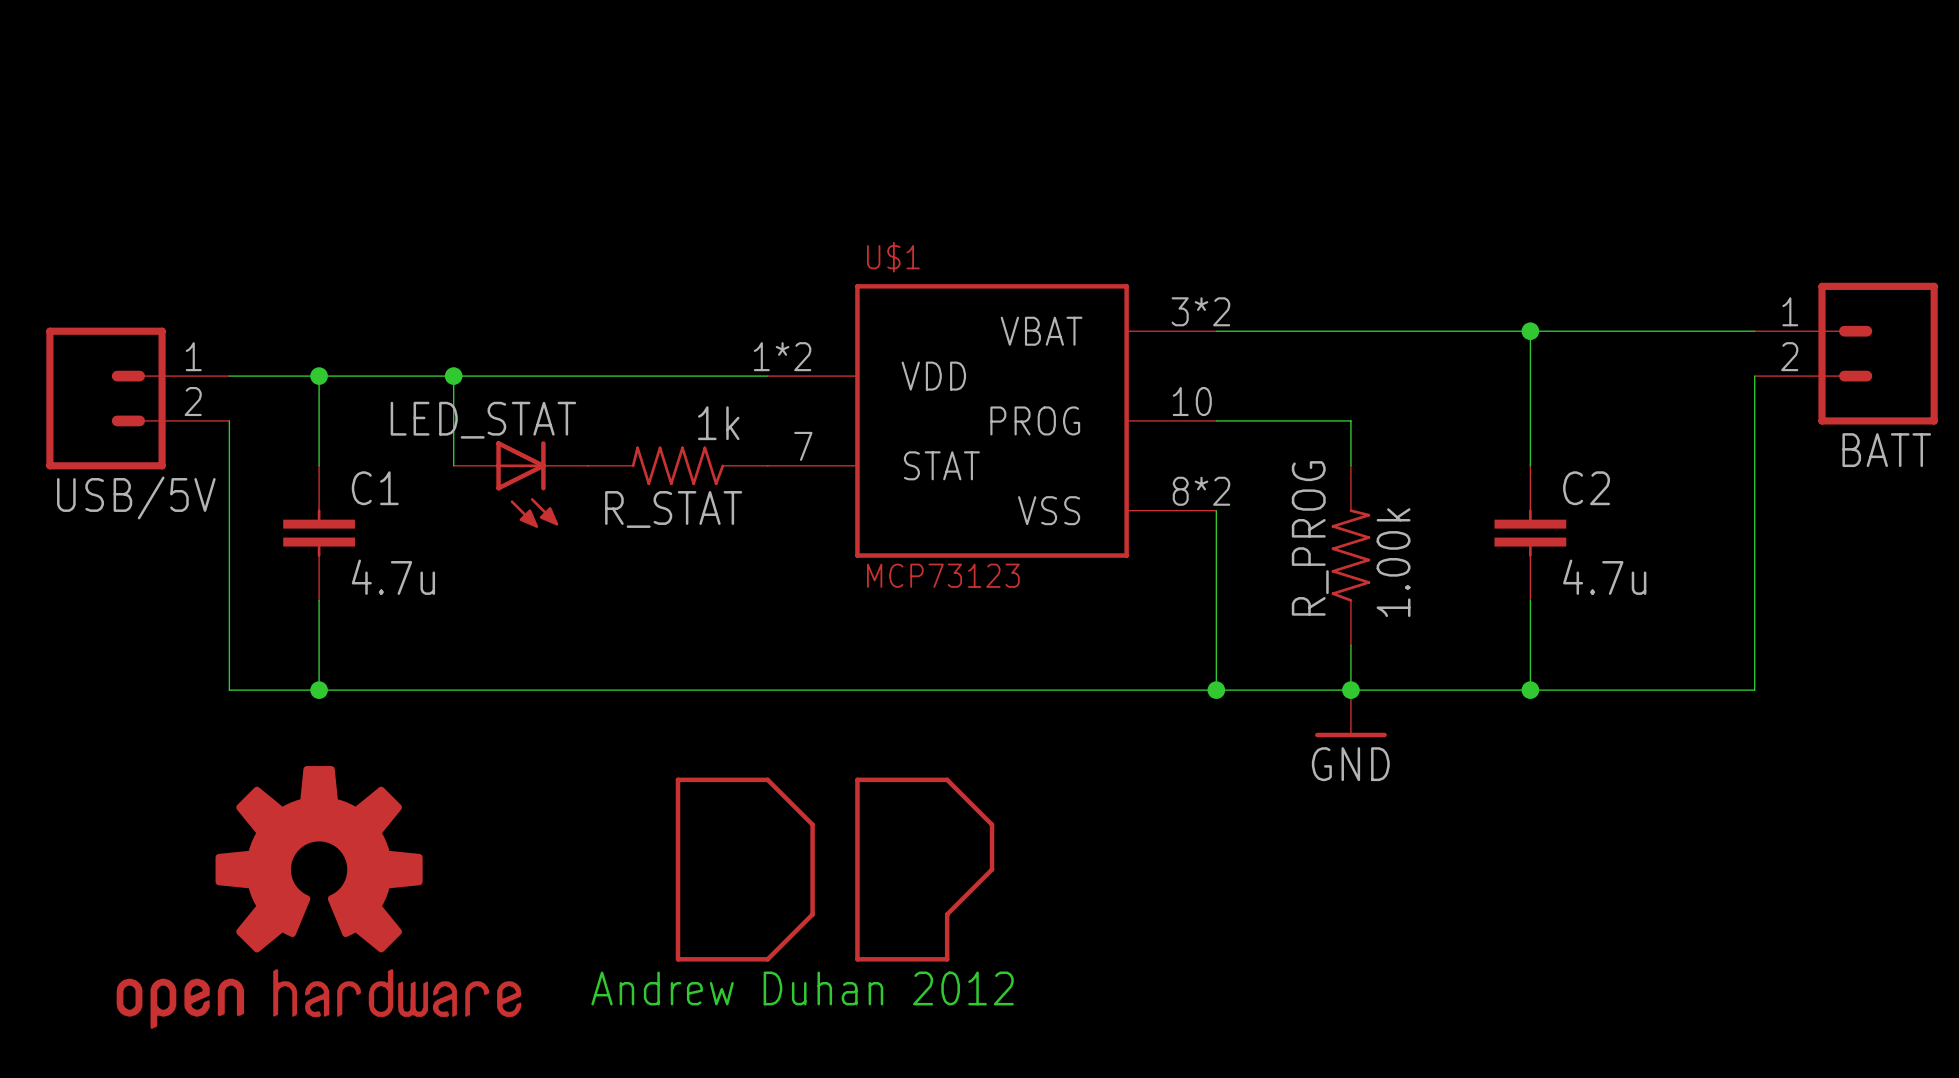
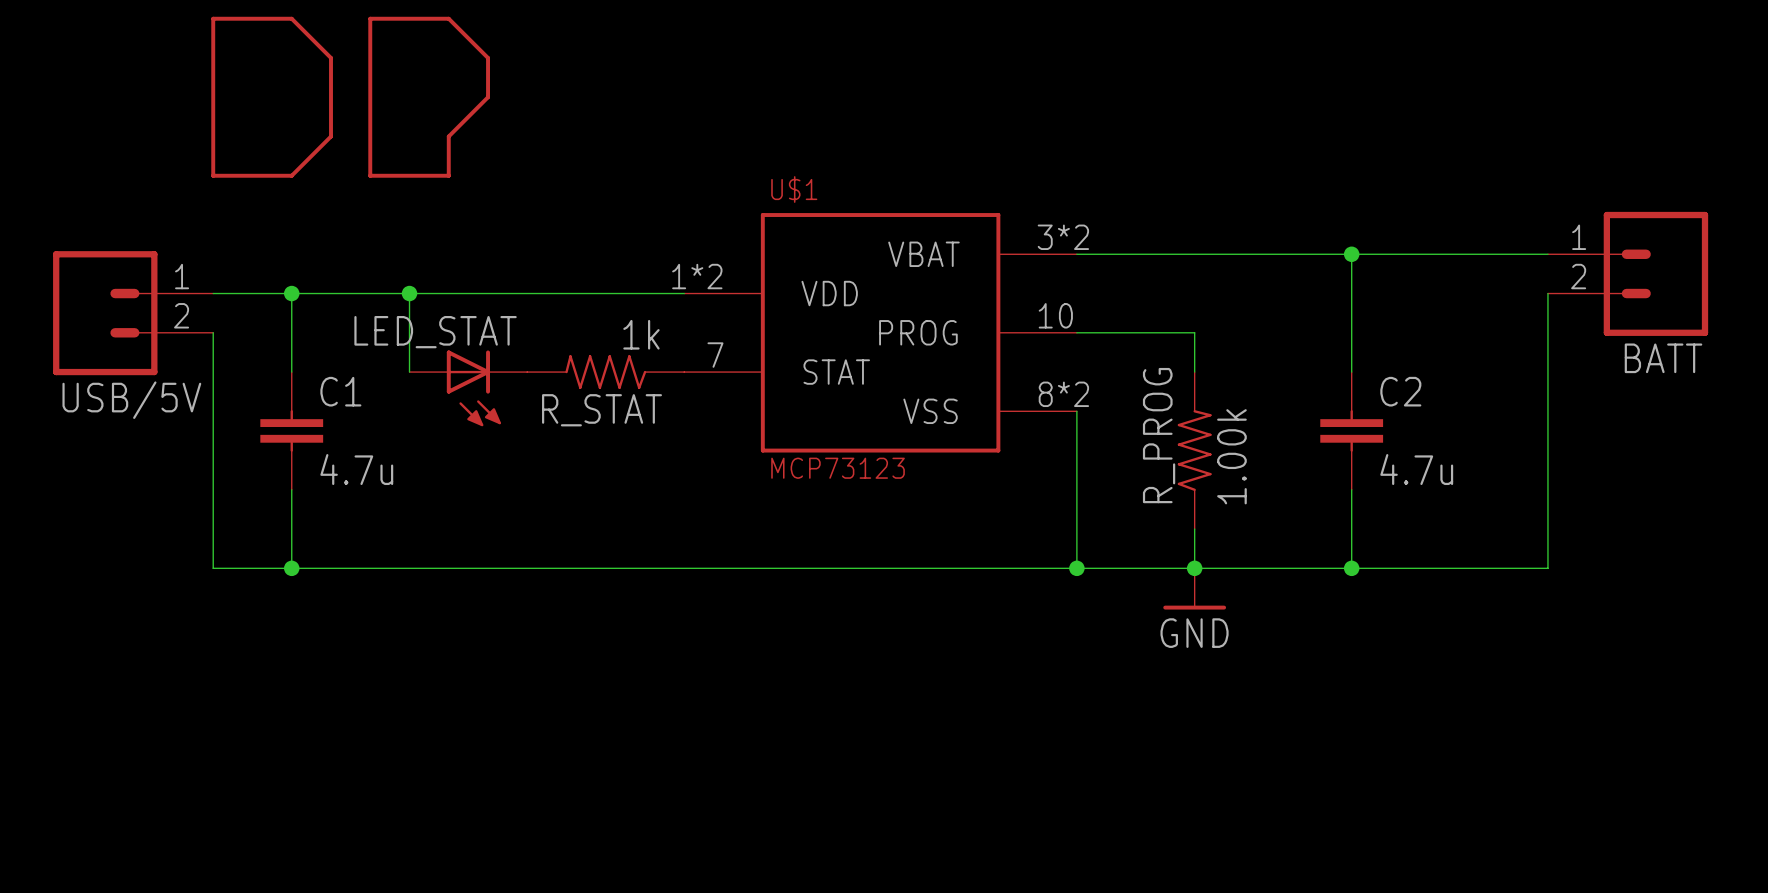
part: none -> (350, 97)
part: (835, 869) -> none
part: (318, 897) -> none
text: Andrew Duhan 2012 (802, 988) -> none

